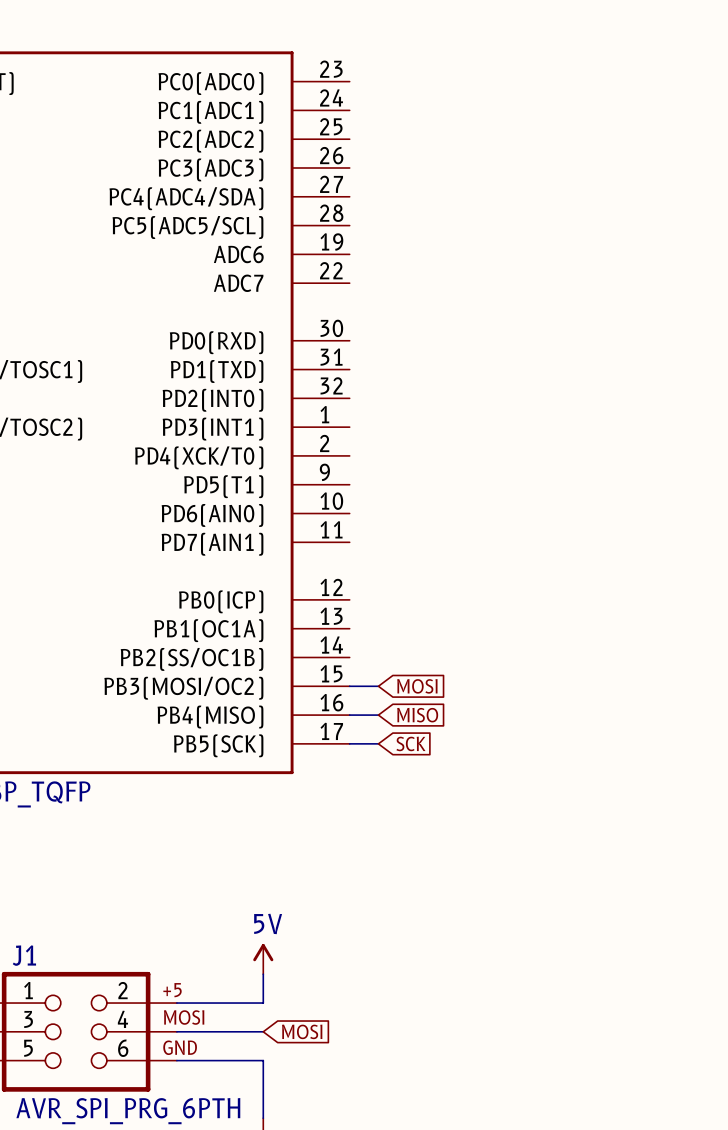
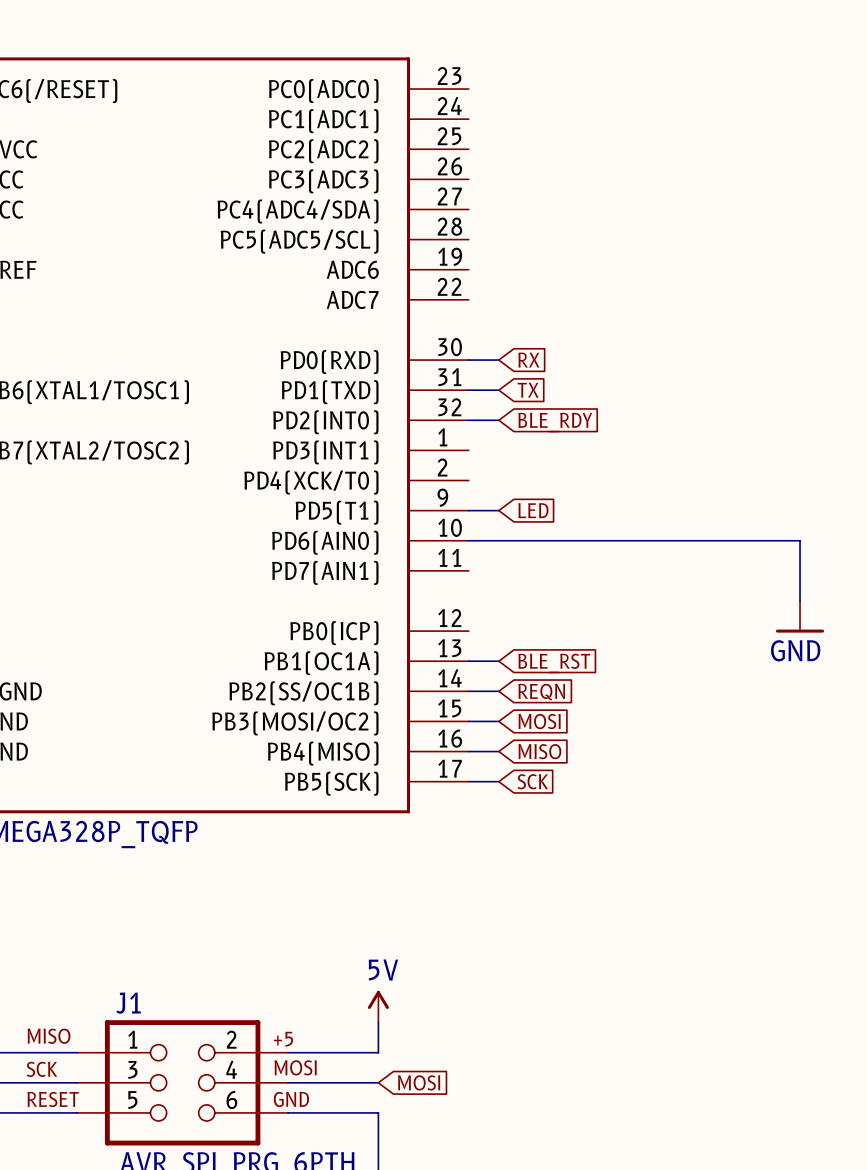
wire: none -> (468, 360) (498, 360)
global label: none -> RX (528, 360)
wire: none -> (468, 390) (498, 390)
global label: none -> TX (528, 390)
wire: none -> (468, 420) (498, 420)
global label: none -> BLE_RDY (555, 422)
wire: none -> (468, 510) (498, 510)
global label: none -> LED (533, 510)
wire: none -> (468, 540) (800, 540) (800, 600)
power symbol: none -> GND (800, 616)
wire: none -> (468, 661) (498, 661)
global label: none -> BLE_RST (554, 663)
wire: none -> (468, 691) (498, 691)
global label: none -> REQN (541, 692)

